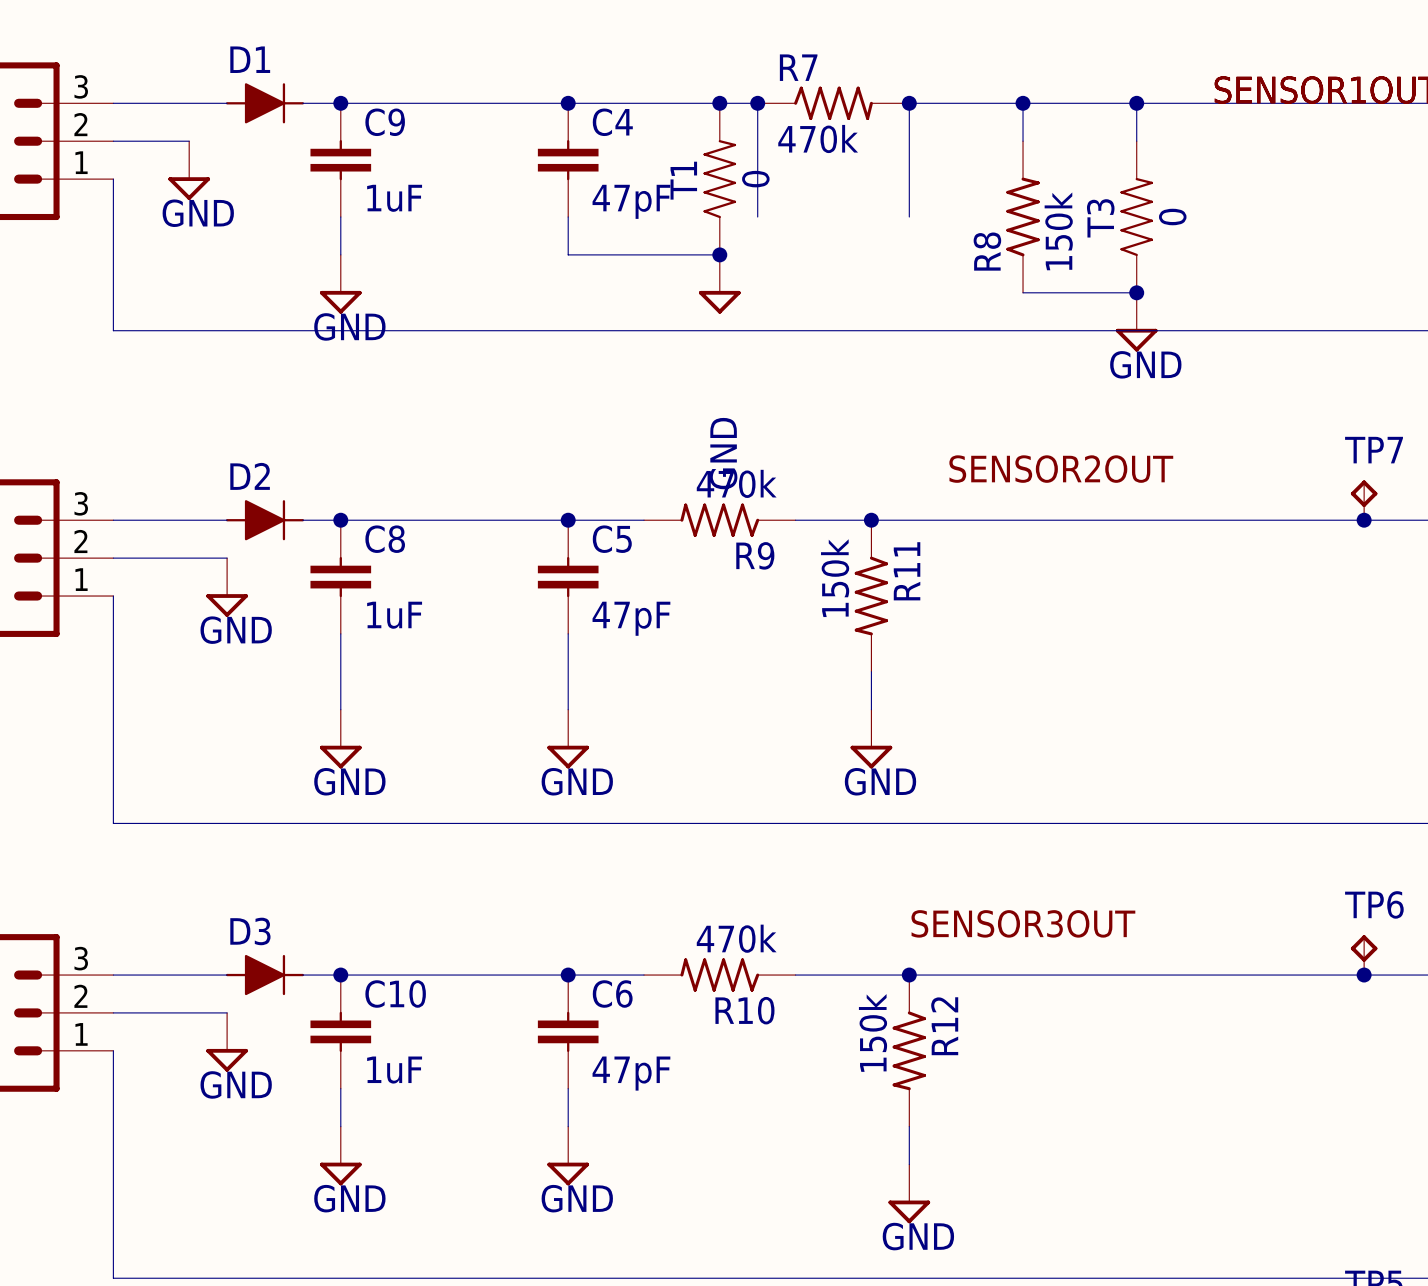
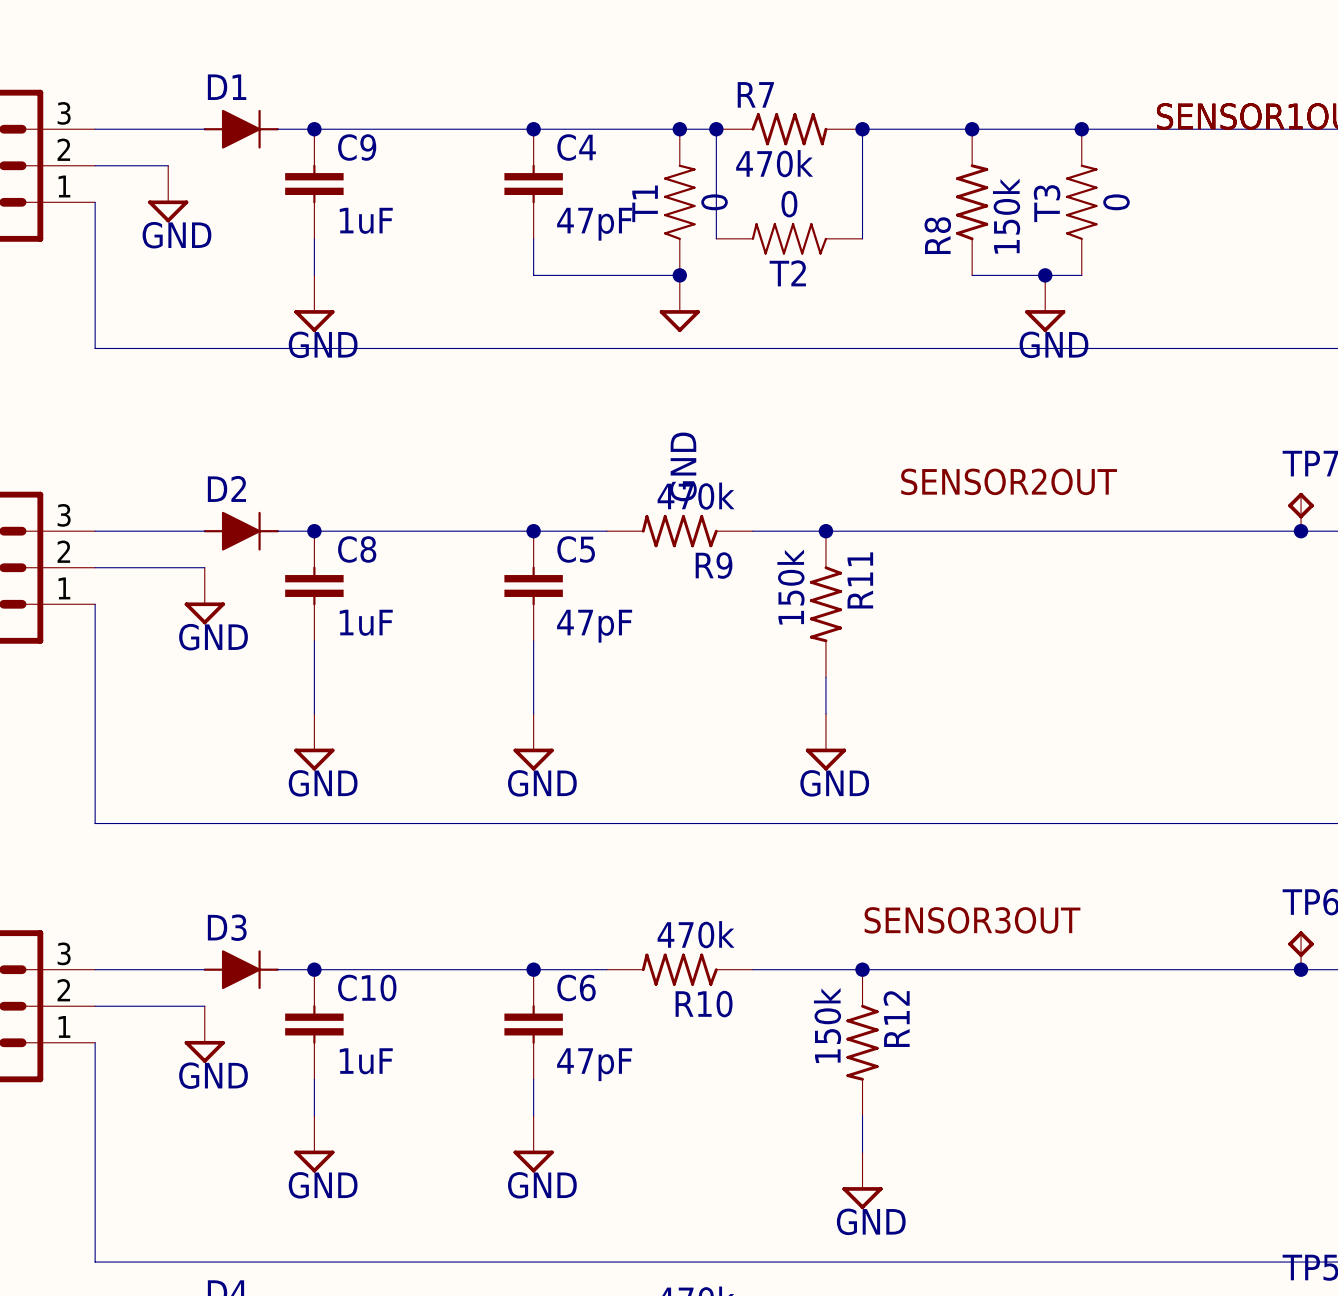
T2: none -> 0 (789, 238)
R8 position: (1023, 217) -> (972, 202)
T3 position: (1136, 217) -> (1081, 202)
wire: (1023, 292) (1136, 292) -> (972, 275) (1081, 275)
junction position: (1136, 292) -> (1045, 275)
power symbol position: GND (1136, 322) -> GND (1045, 303)

